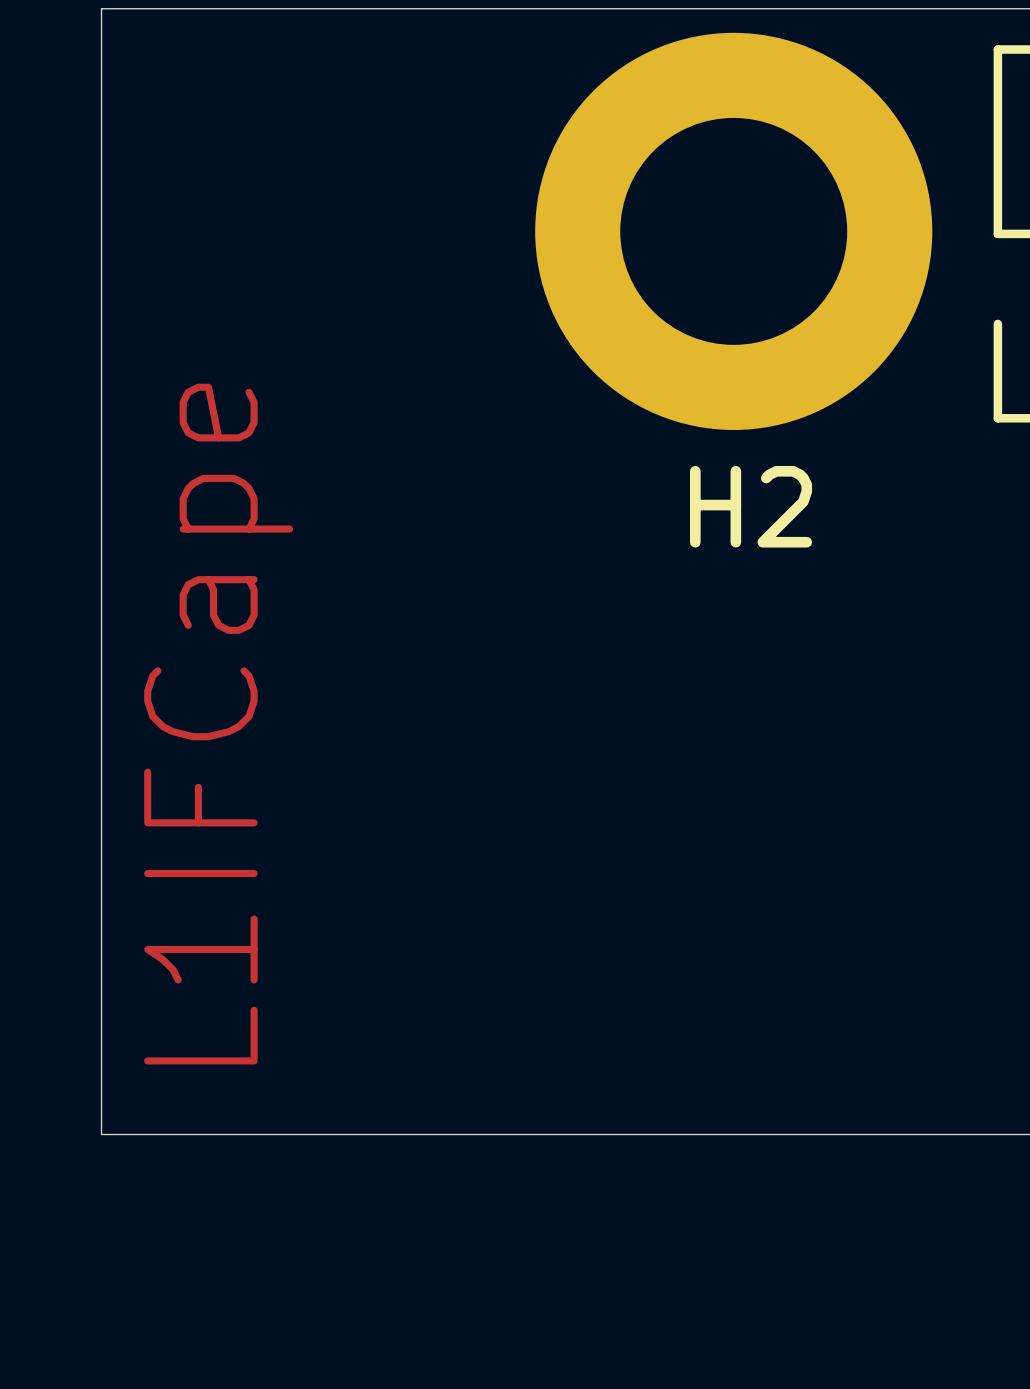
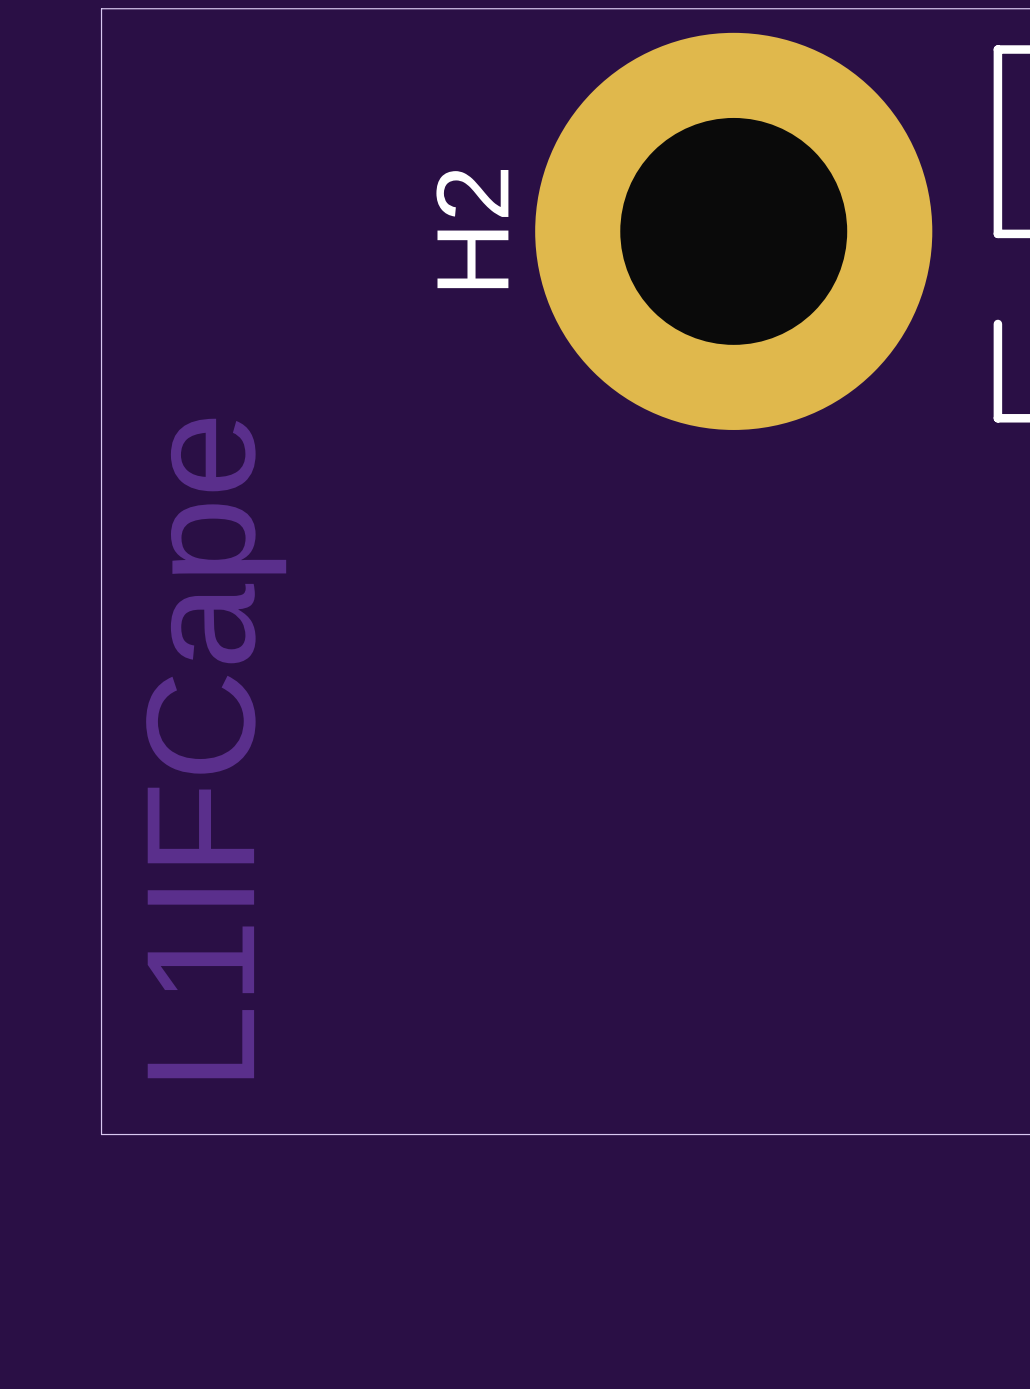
H2 name rotation: 0° (751, 506) -> 90° counterclockwise (472, 229)
H2 name position: H2 (751, 506) -> H2 (472, 229)

